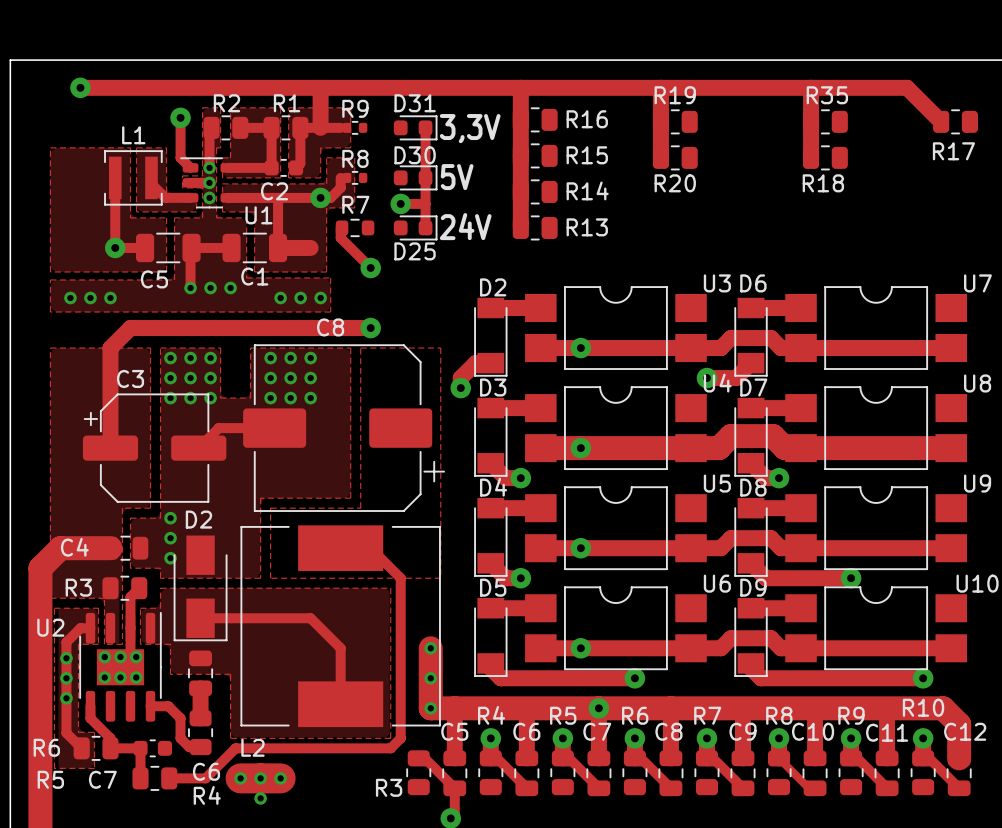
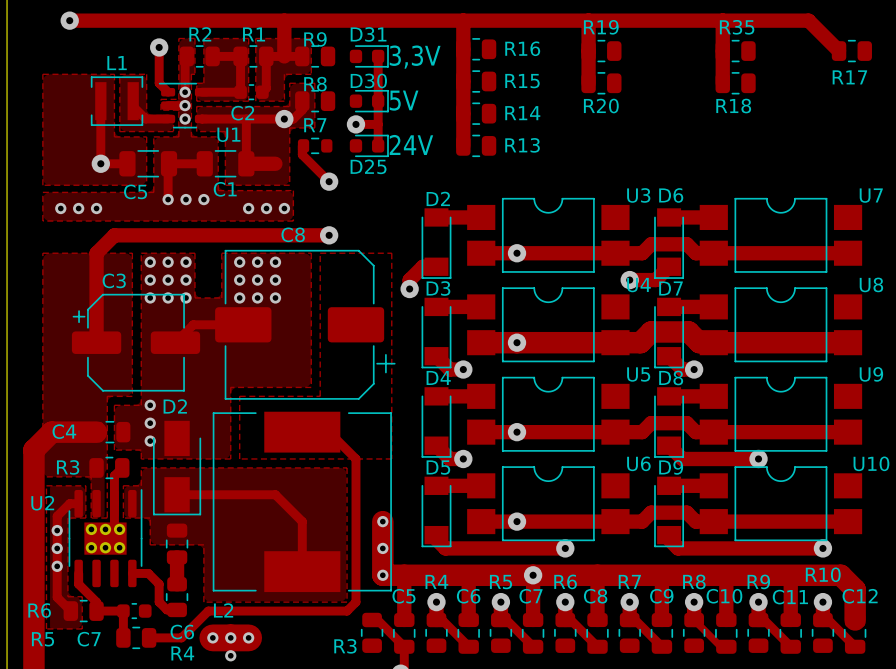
R9 footprint: [342, 120, 368, 135] -> [295, 45, 336, 68]
R8 footprint: [342, 170, 368, 185] -> [295, 89, 336, 113]

